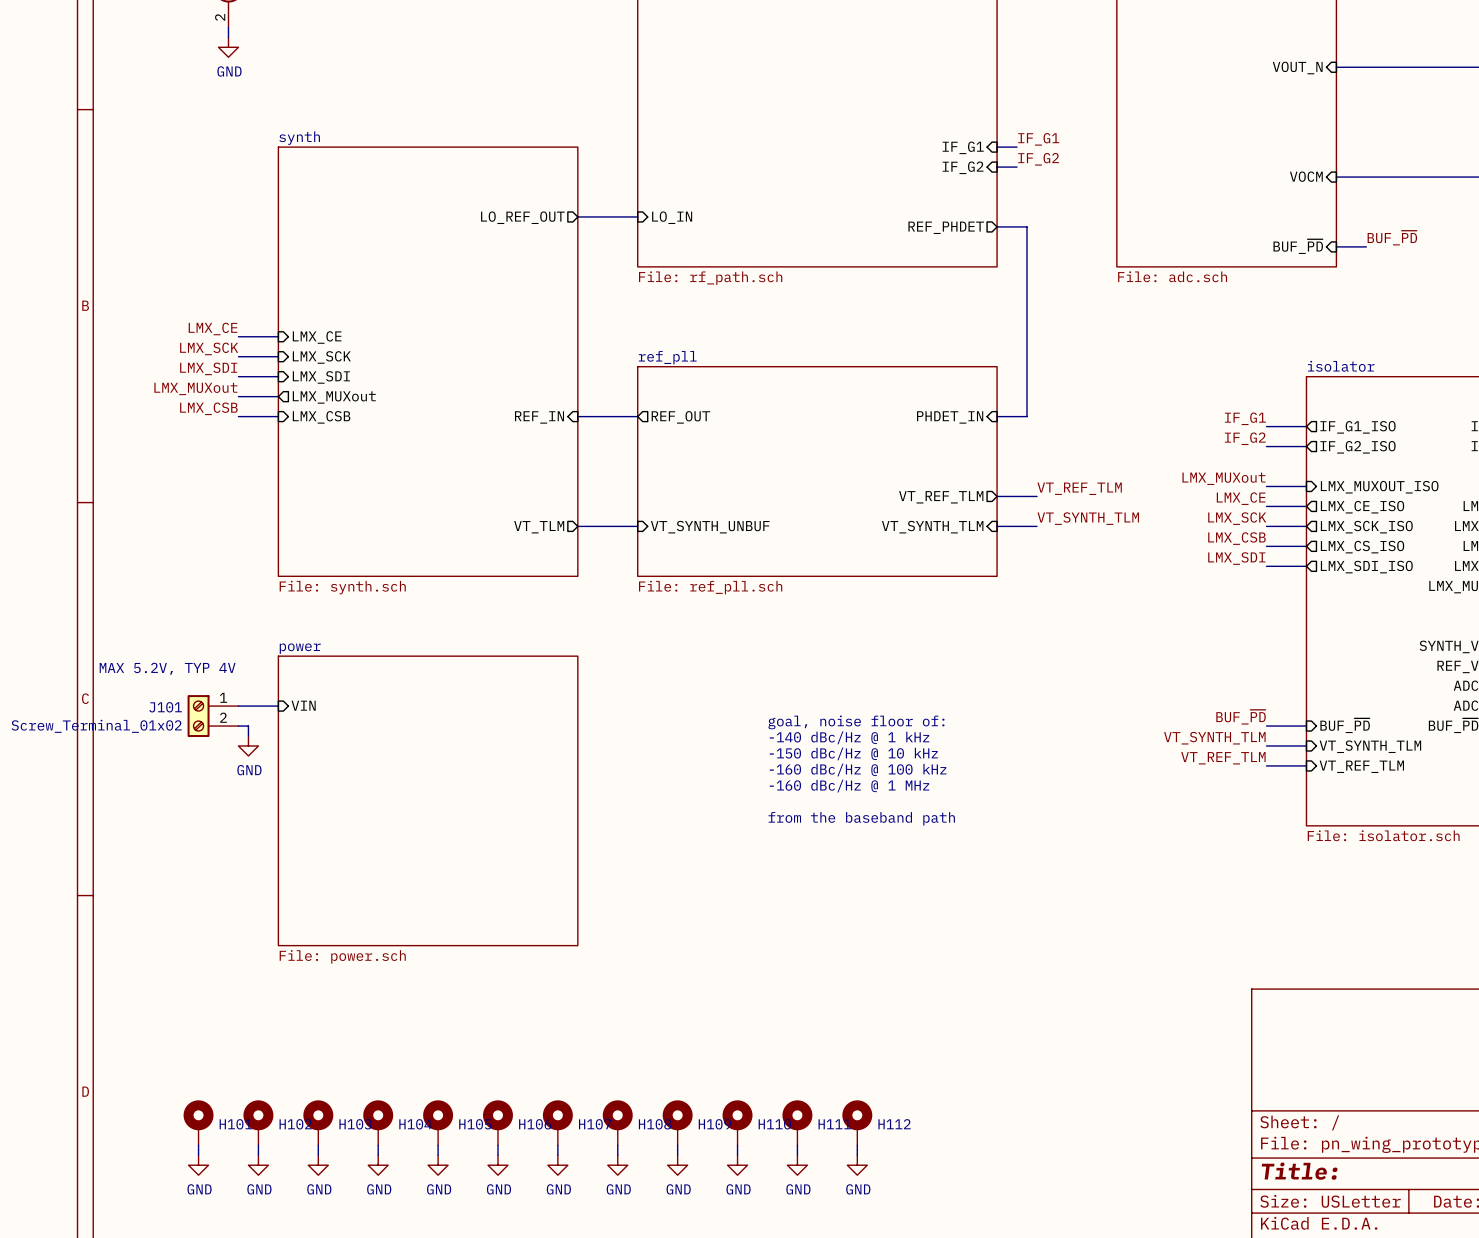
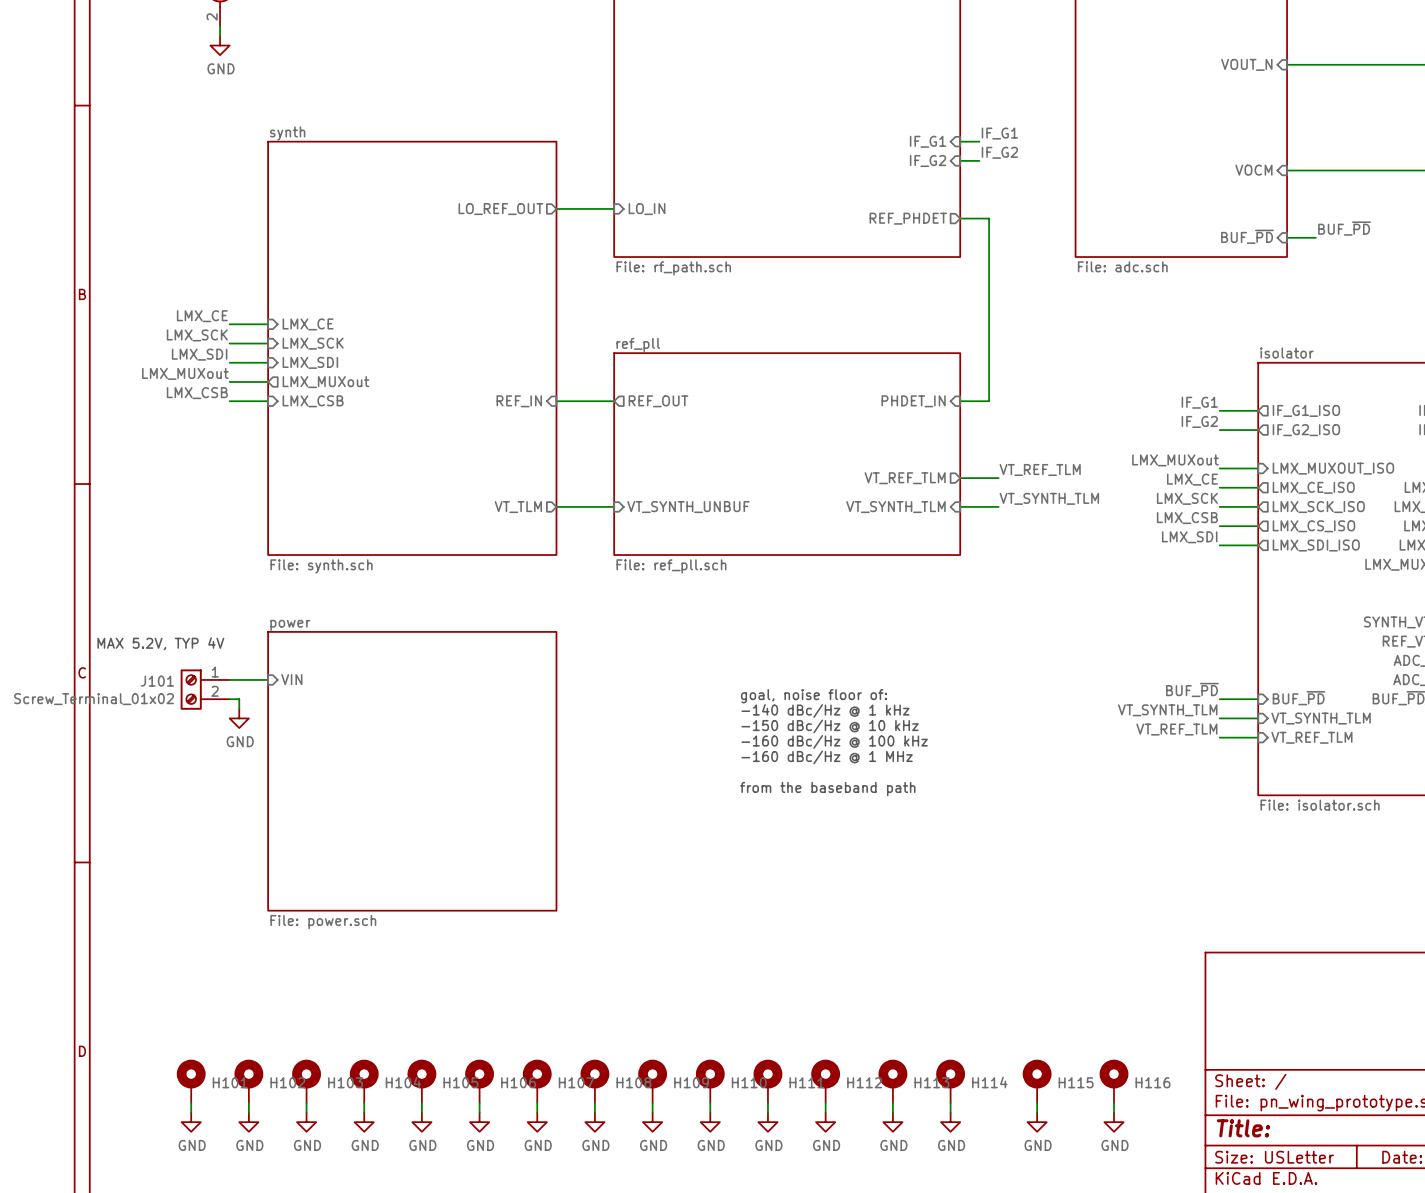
H113: none -> (892, 1081)
H114: none -> (950, 1081)
H115: none -> (1037, 1081)
H116: none -> (1114, 1081)
wire: none -> (892, 1102) (892, 1112)
wire: none -> (950, 1102) (950, 1112)
wire: none -> (1037, 1102) (1037, 1112)
wire: none -> (1114, 1102) (1114, 1112)
power symbol: none -> GND (892, 1122)
power symbol: none -> GND (950, 1122)
power symbol: none -> GND (1037, 1122)
power symbol: none -> GND (1114, 1122)

